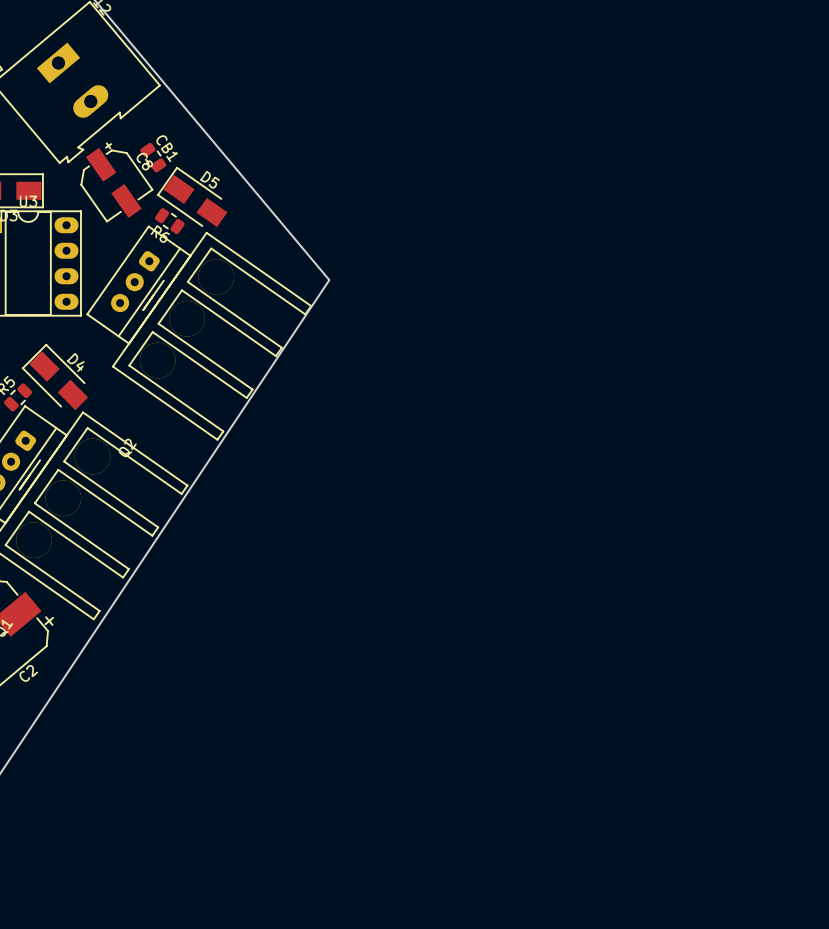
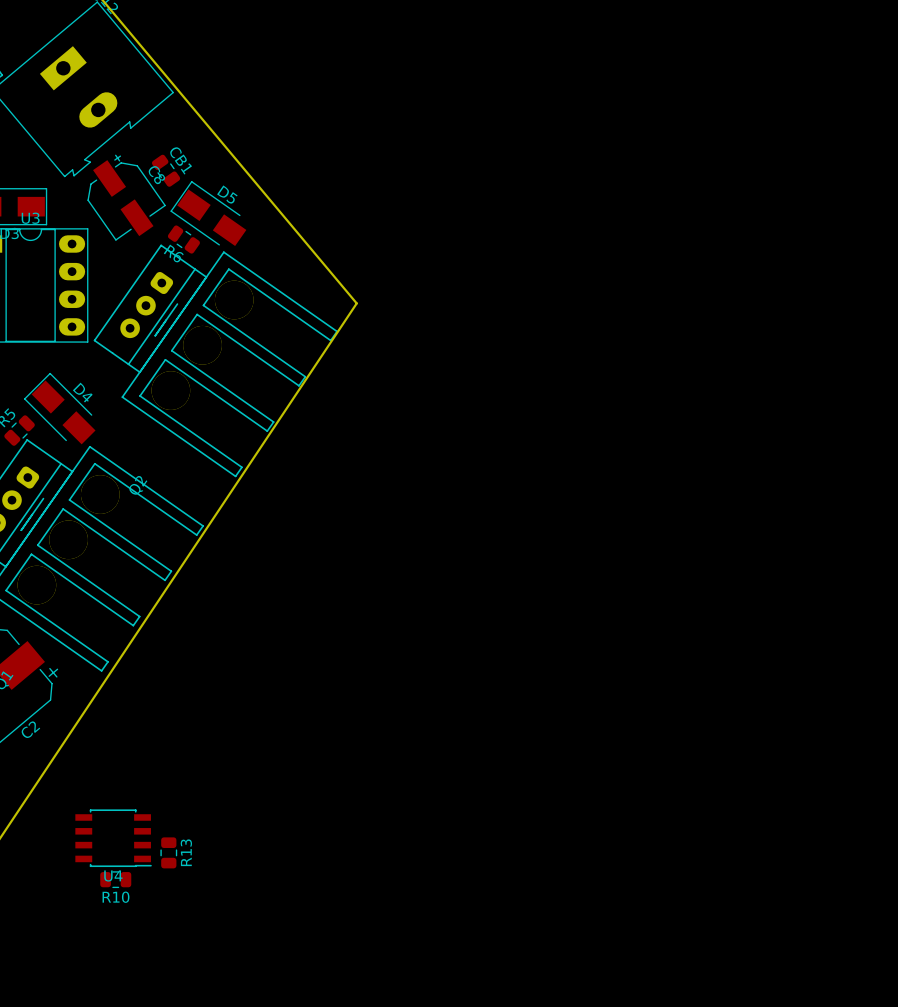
U4: none -> (113, 838)
R13: none -> (168, 852)
R10: none -> (115, 879)

